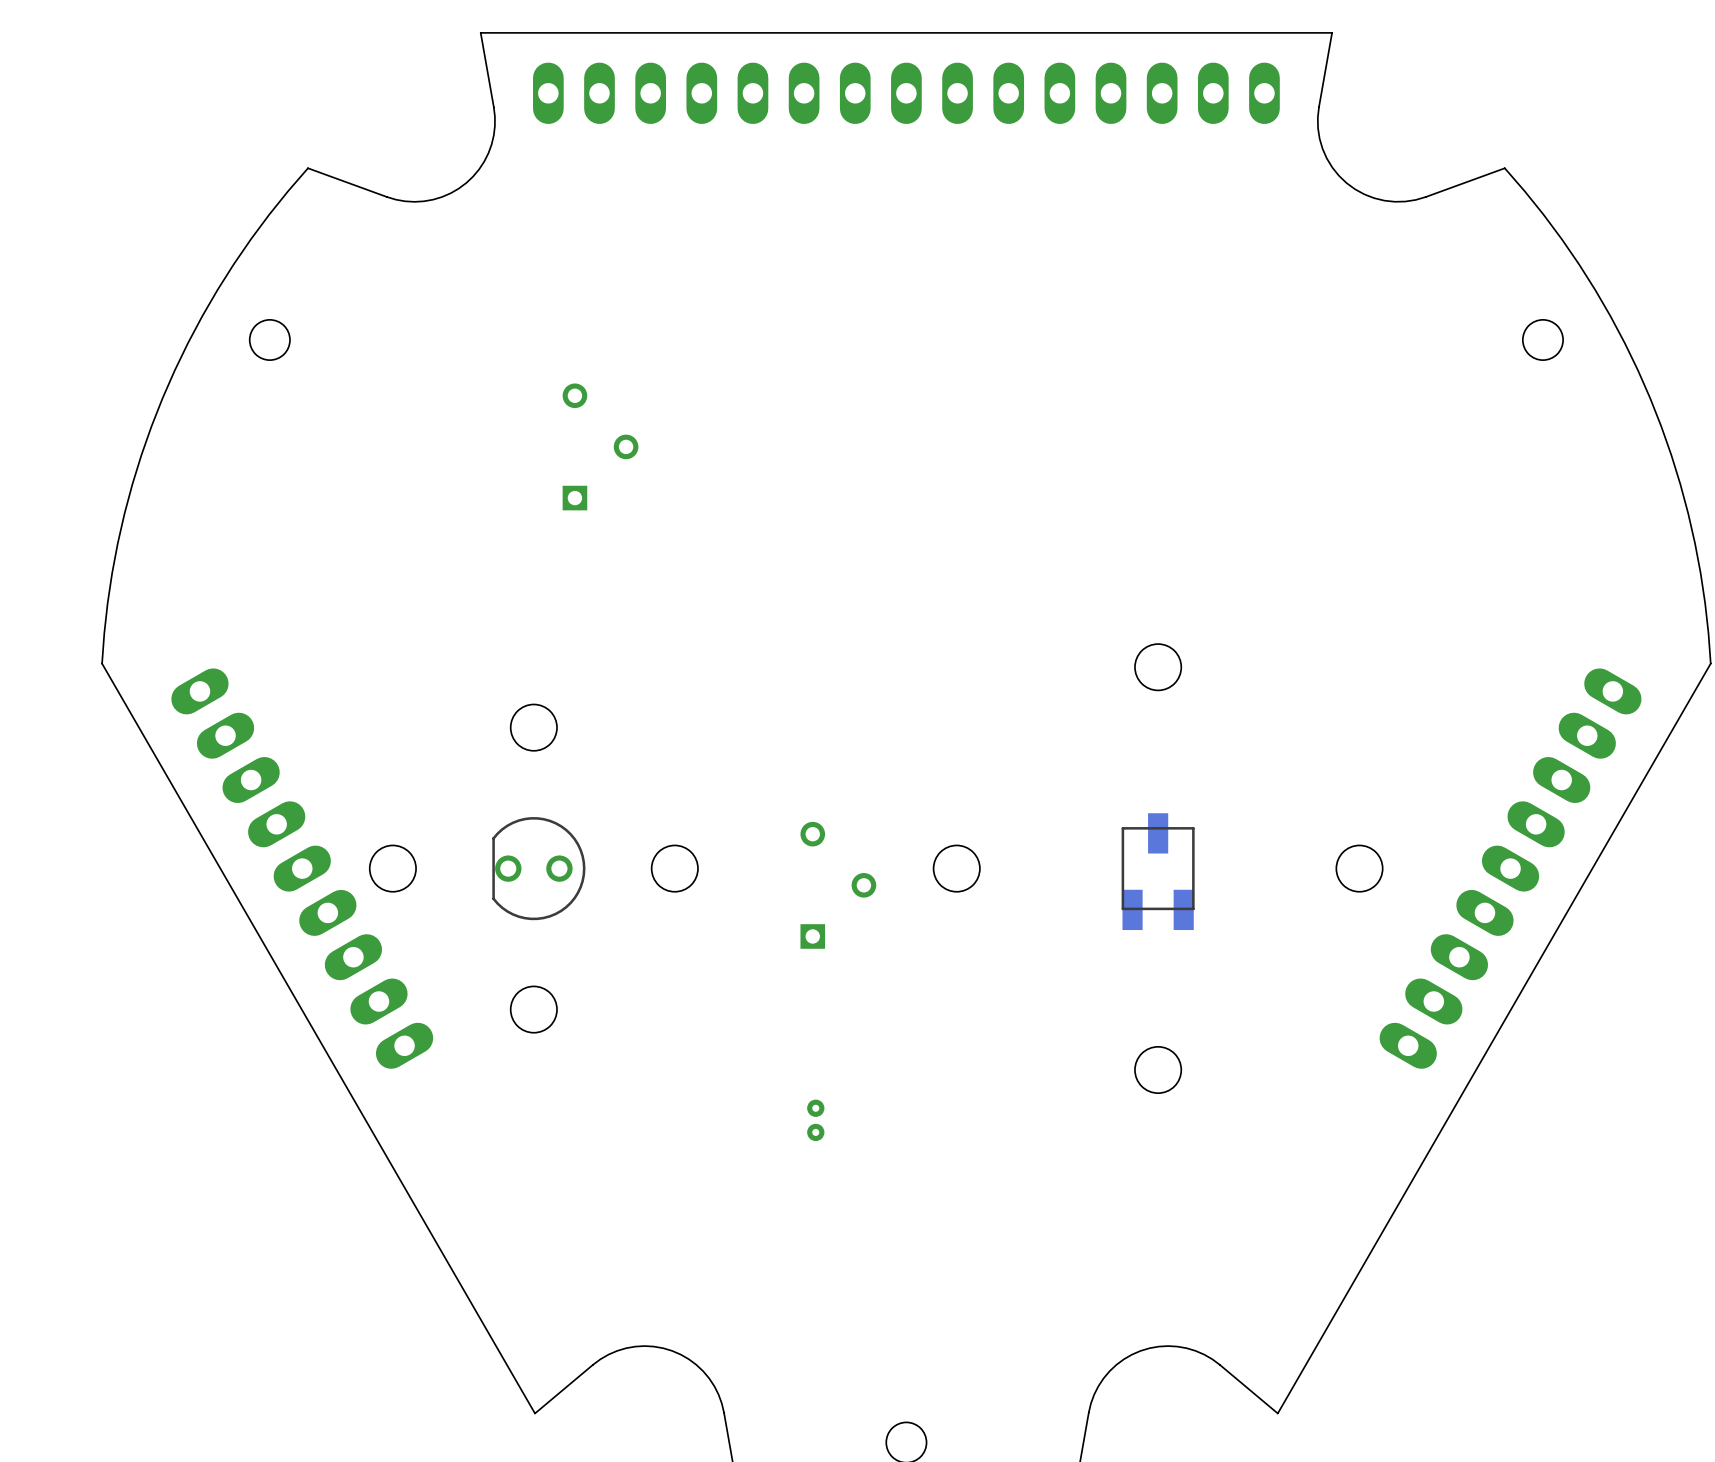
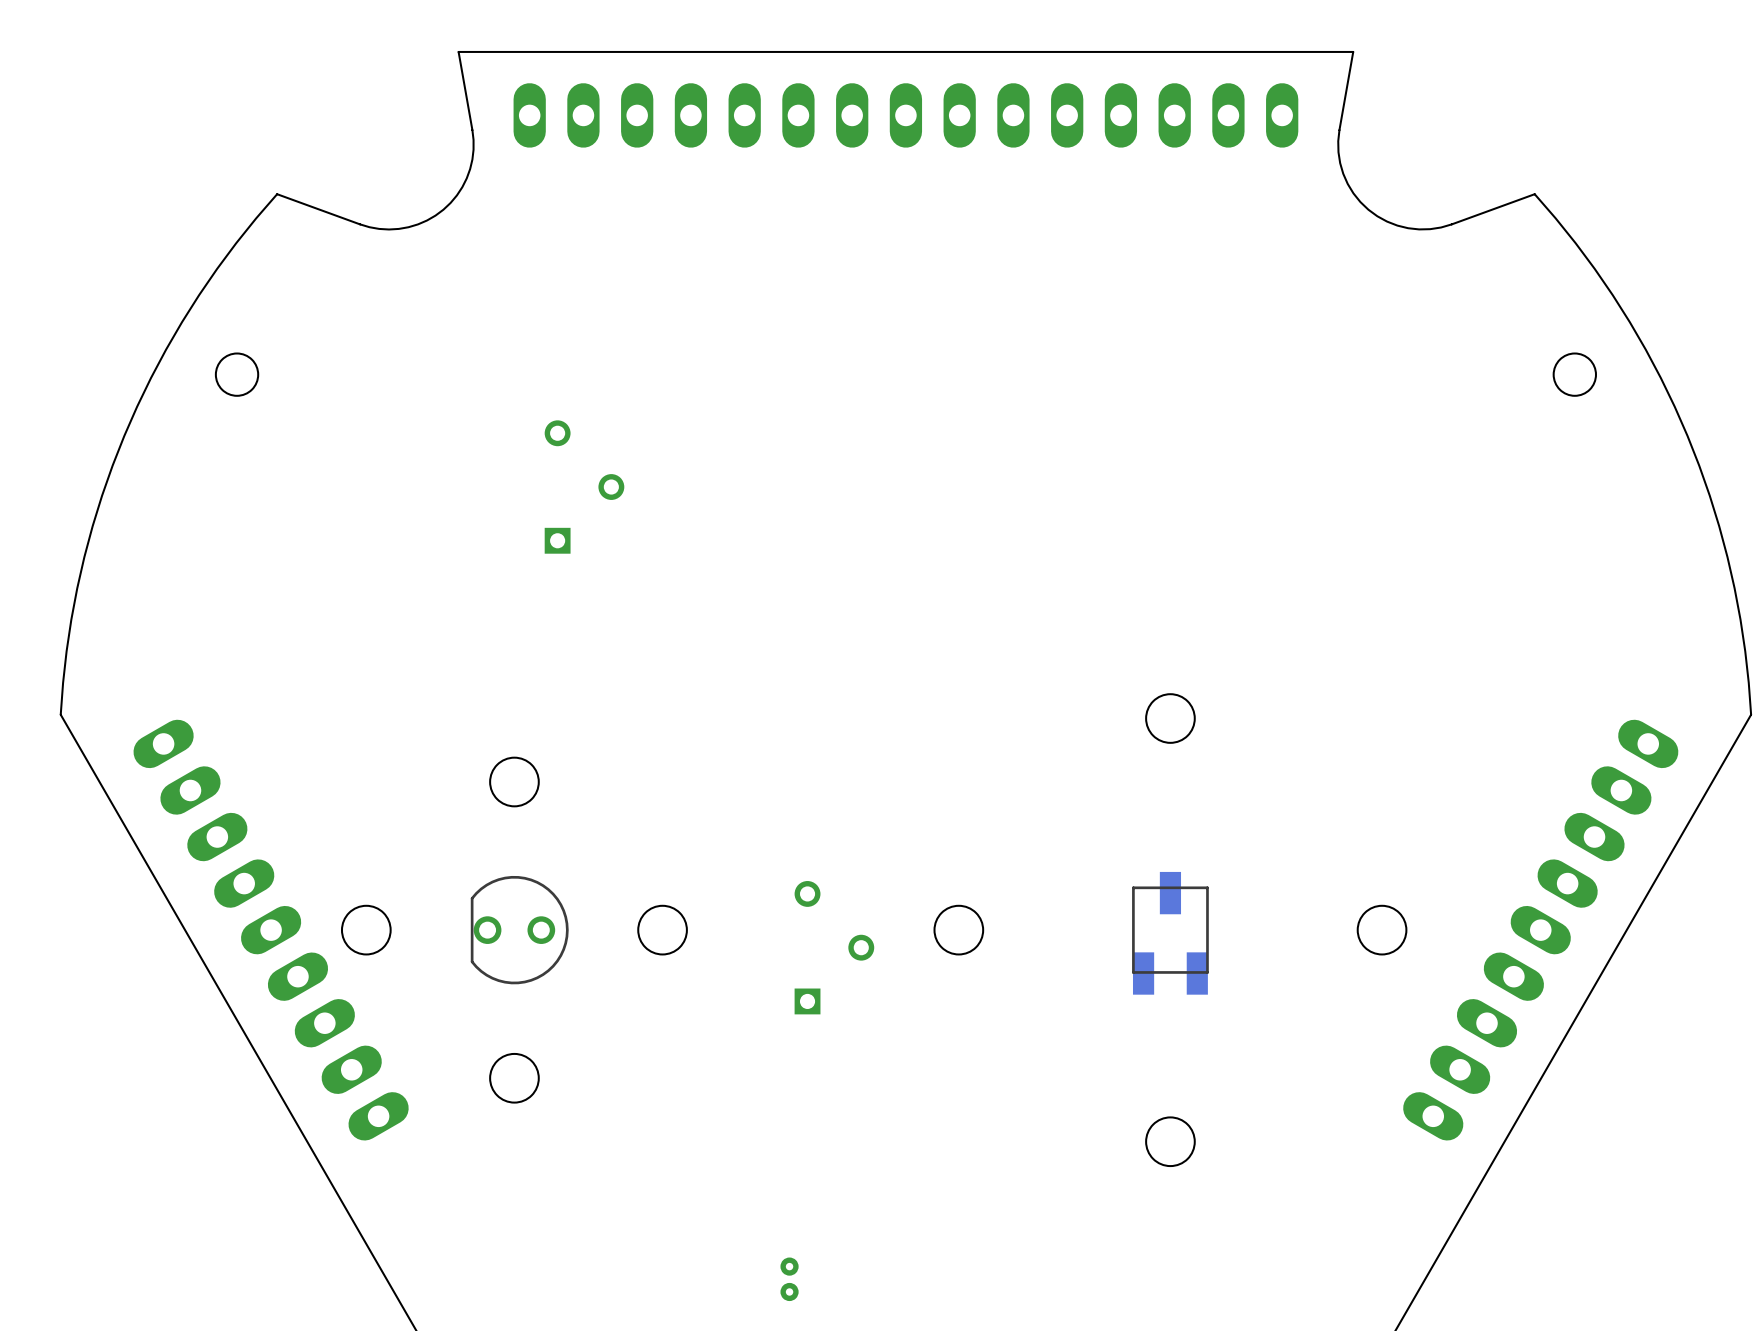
part position: (815, 1120) -> (789, 1279)

